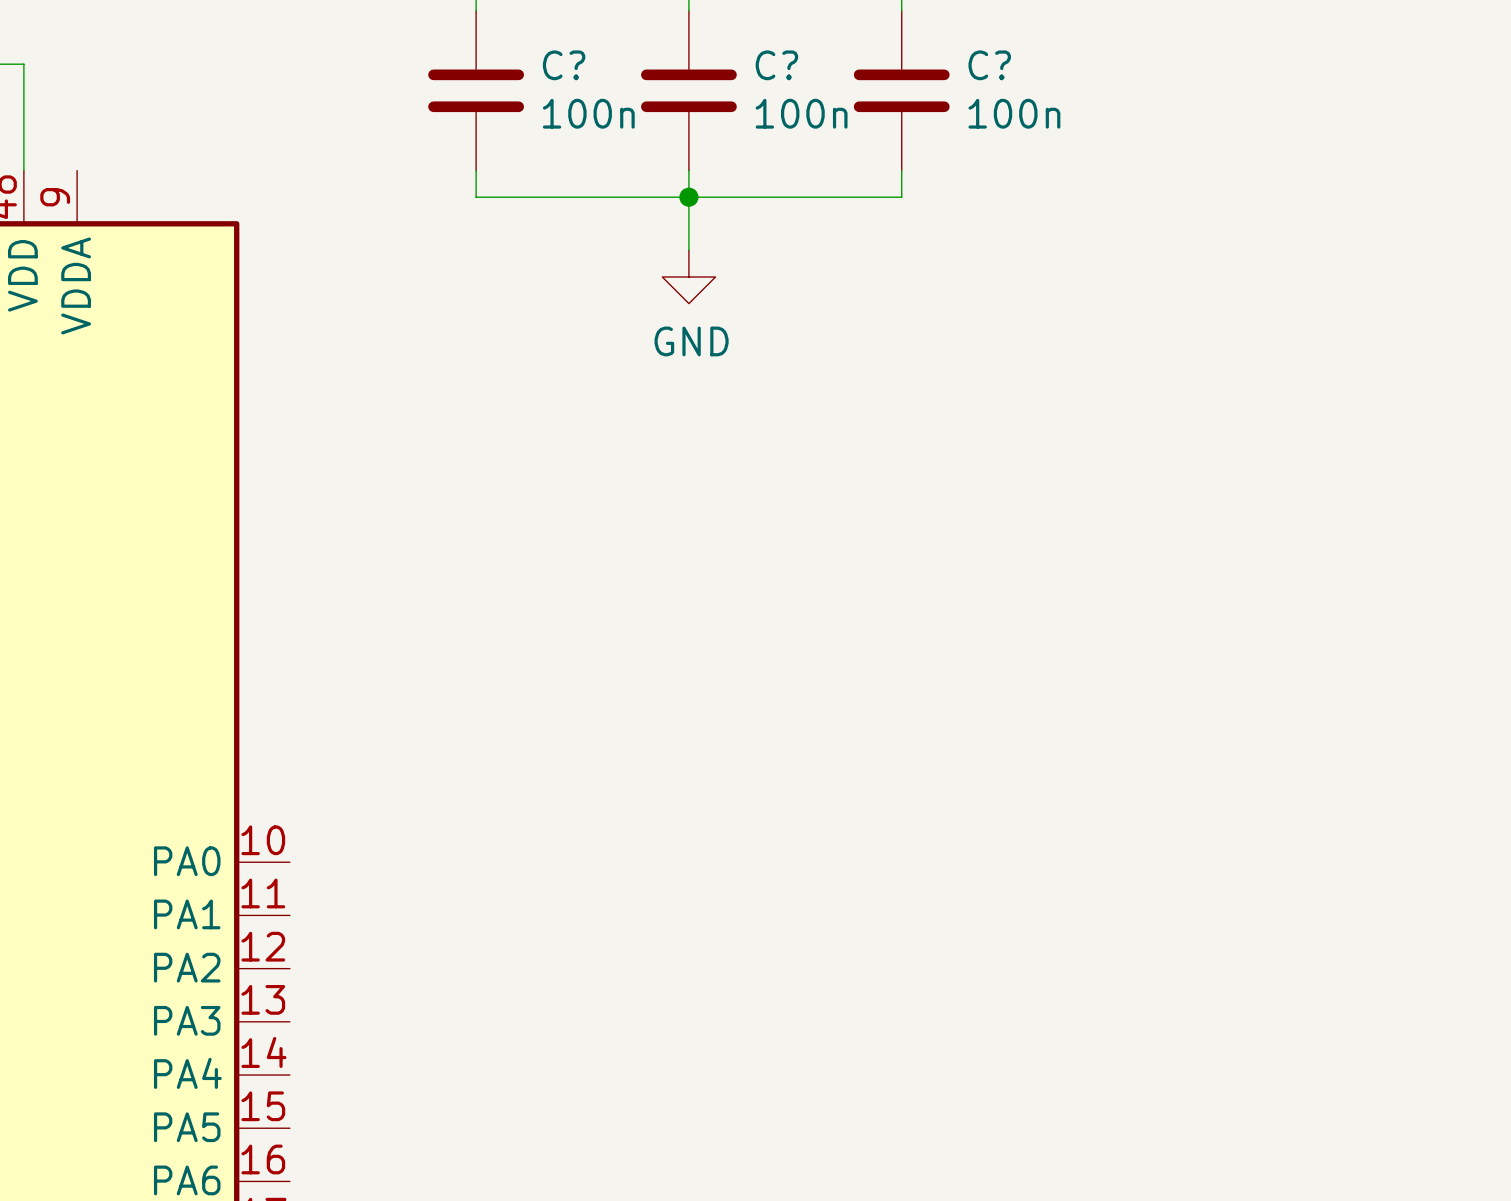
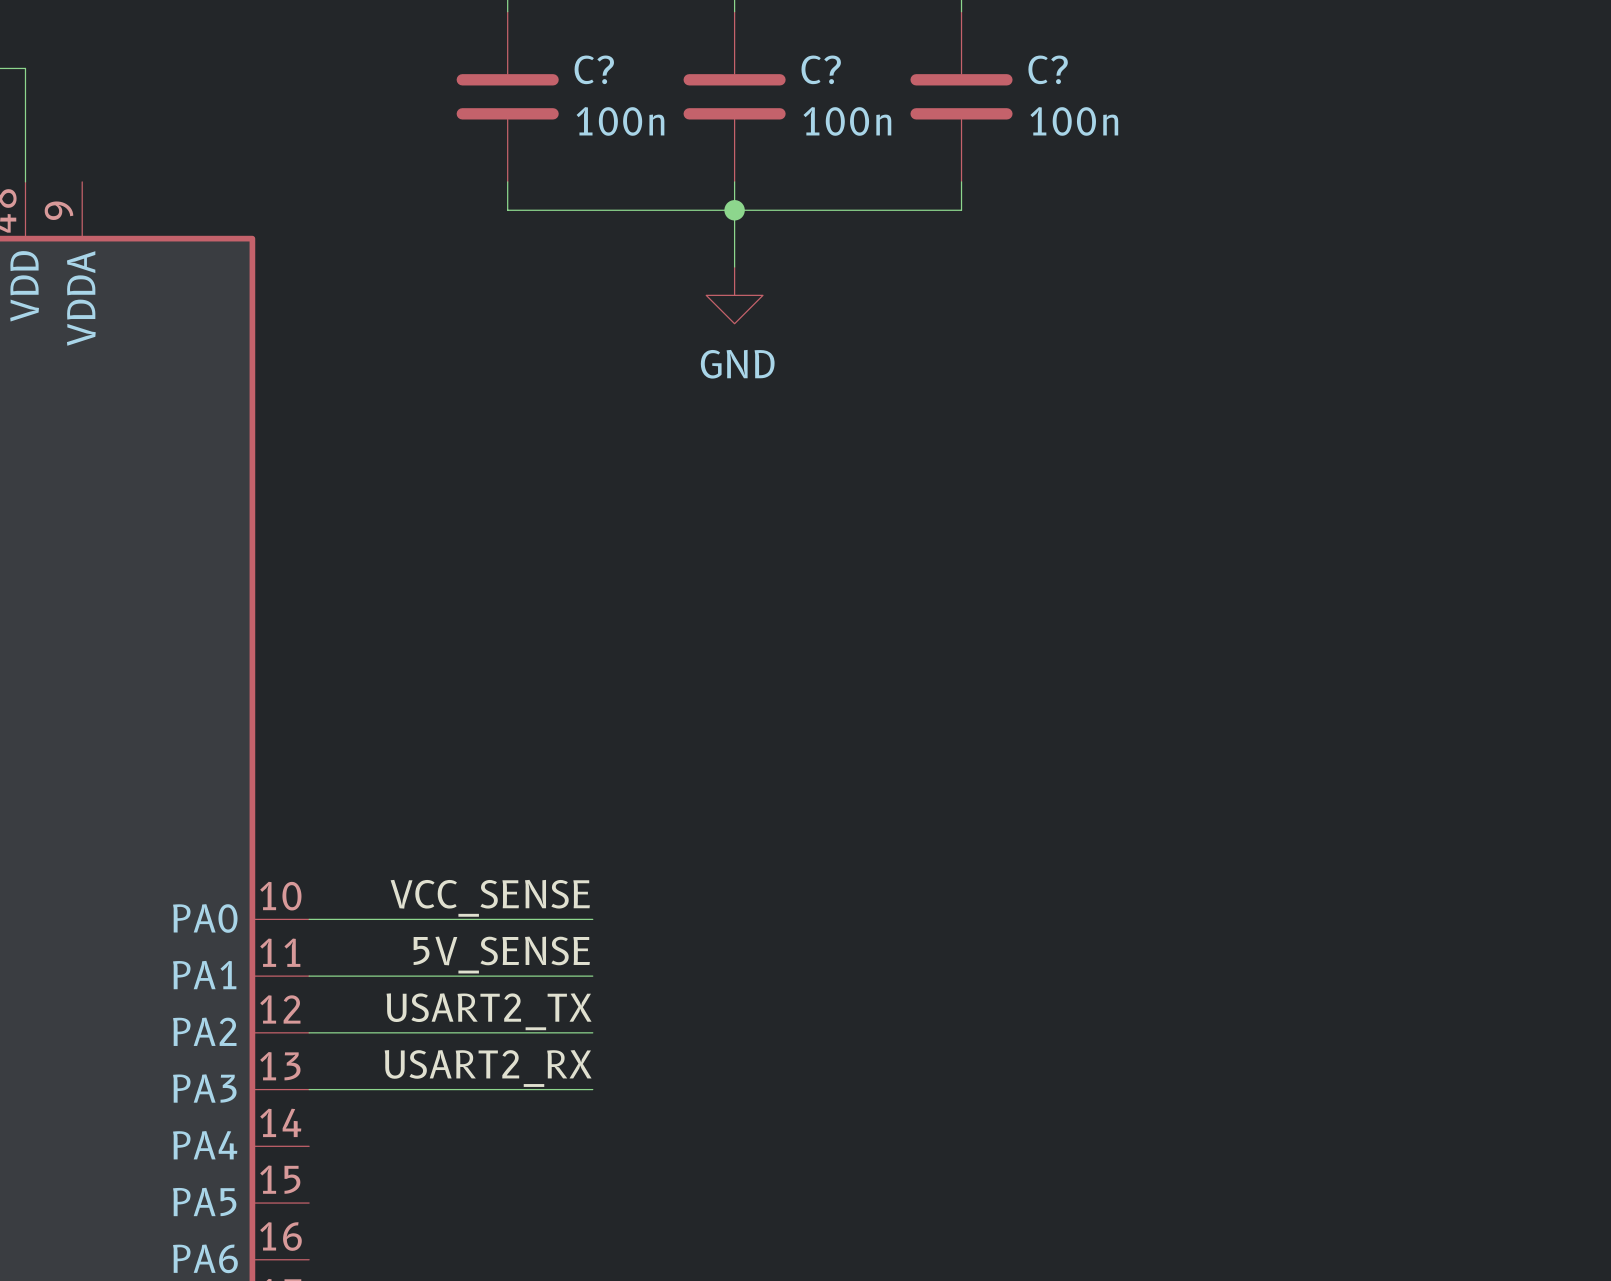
label: none -> VCC_SENSE (490, 898)
wire: none -> (309, 919) (592, 919)
label: none -> 5V_SENSE (501, 955)
wire: none -> (309, 976) (592, 976)
label: none -> USART2_TX (489, 1011)
wire: none -> (309, 1032) (592, 1032)
label: none -> USART2_RX (488, 1068)
wire: none -> (309, 1089) (592, 1089)

